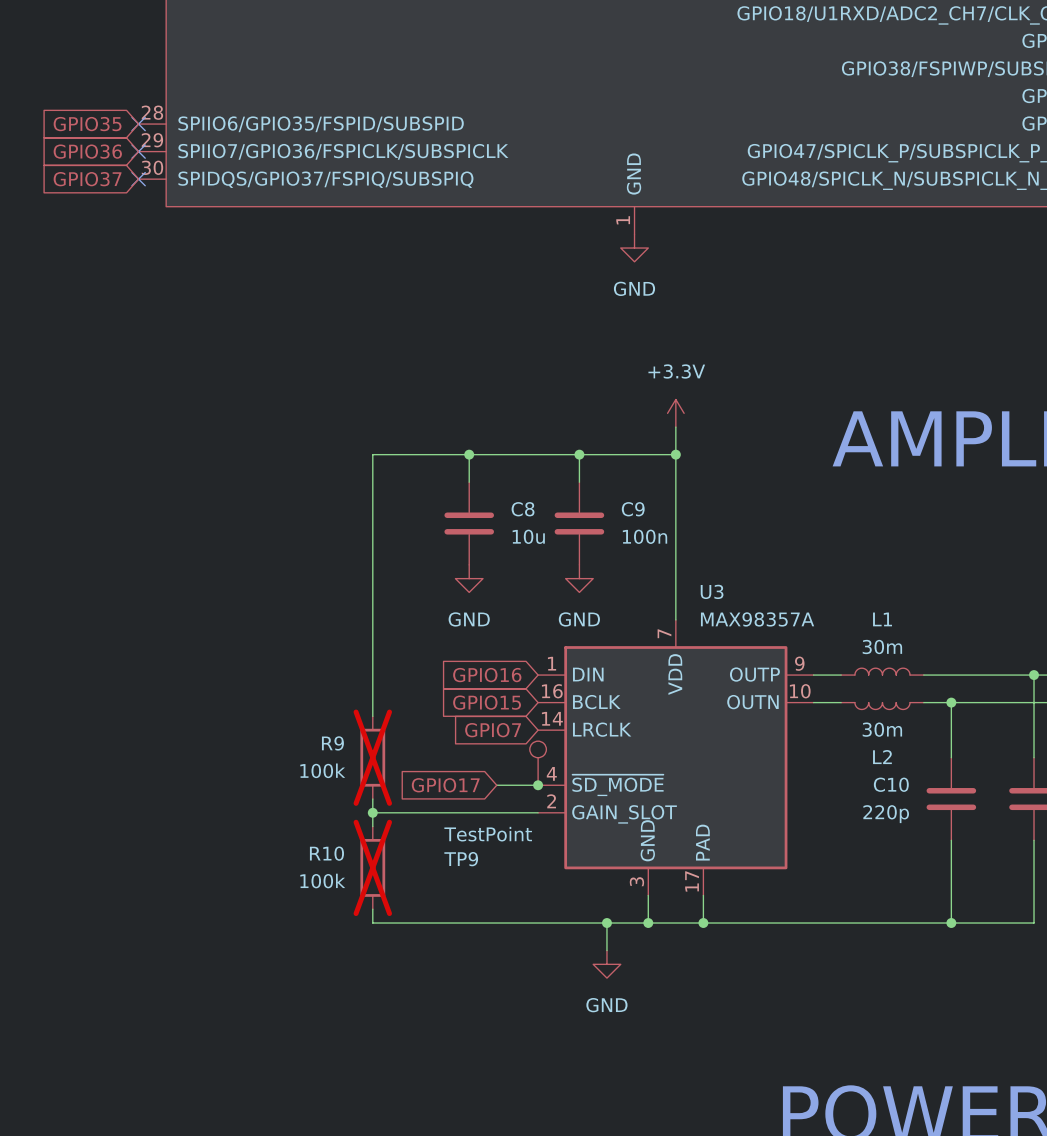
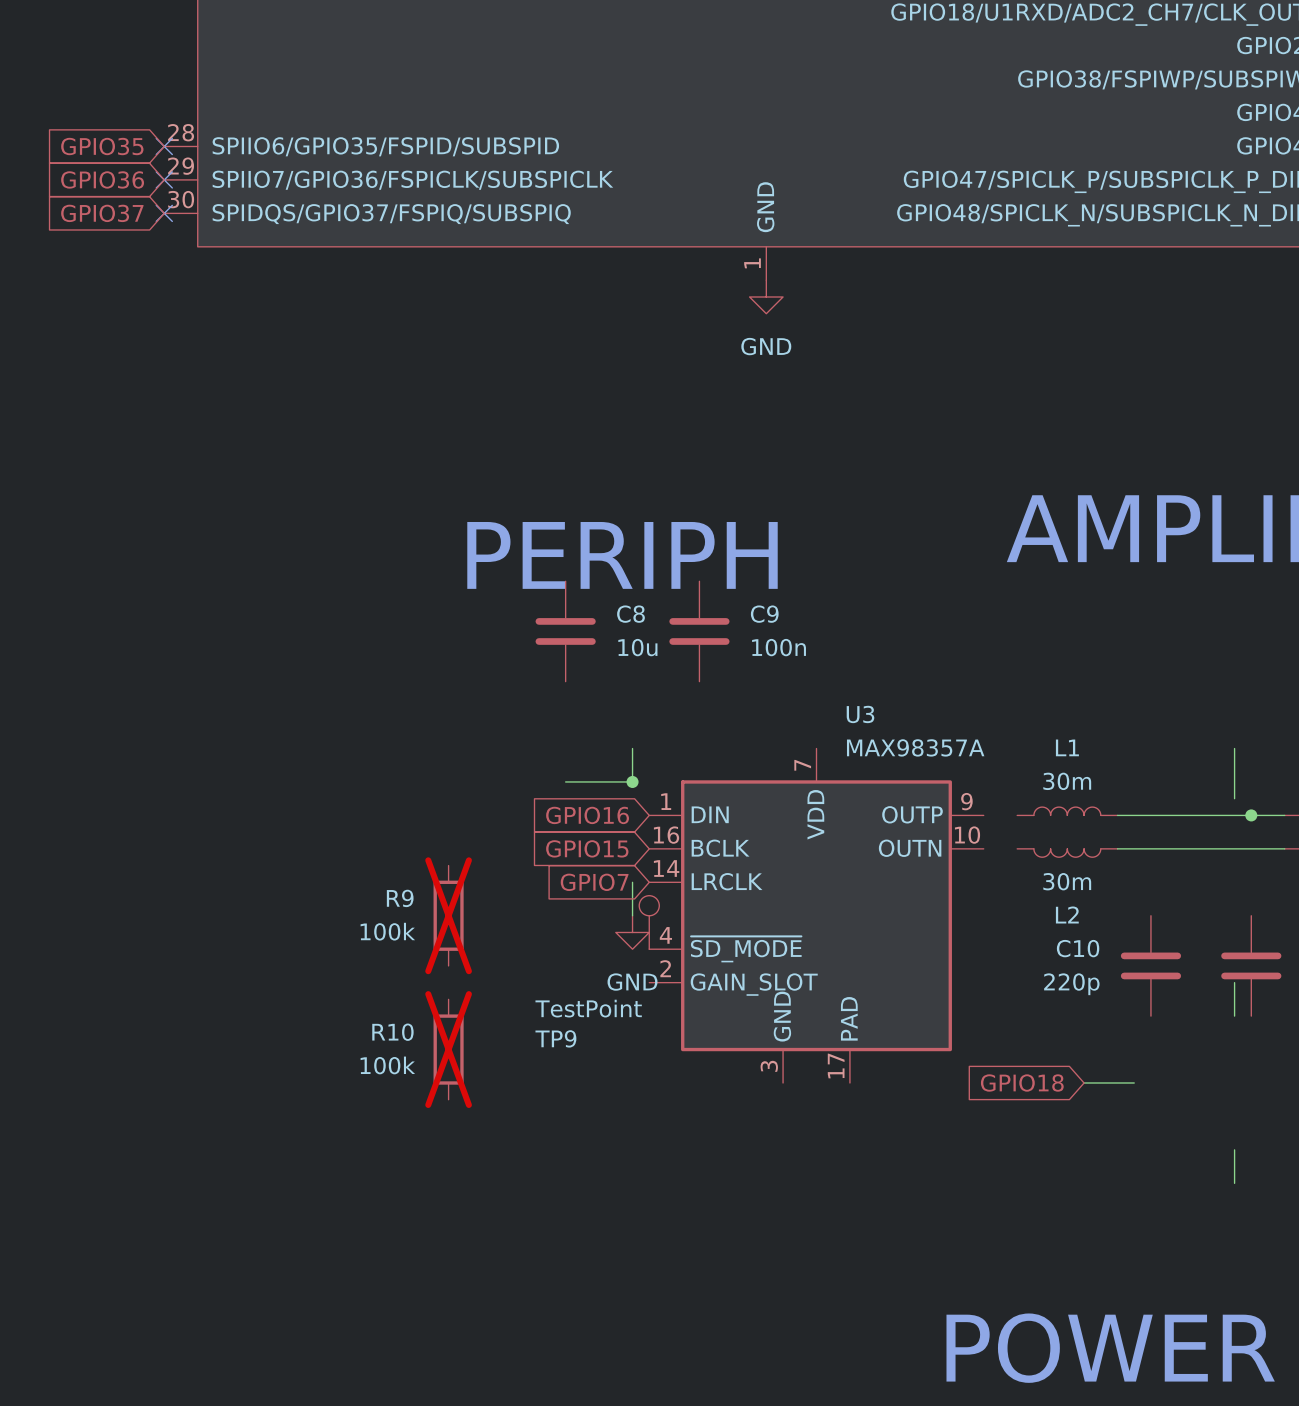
power symbol: +3.3V (675, 413) -> none
wire: (675, 427) (675, 619) -> none
wire: (469, 454) (469, 482) -> none
junction: (469, 454) -> none
wire: (579, 454) (579, 482) -> none
junction: (579, 454) -> none
wire: (675, 454) (372, 454) (372, 716) -> none
junction: (675, 454) -> none
text: none -> PERIPH (622, 555)
power symbol: GND (469, 578) -> none
power symbol: GND (579, 578) -> none
wire: none -> (632, 748) (632, 781) (565, 781)
wire: none -> (1234, 748) (1234, 798)
junction: none -> (632, 781)
wire: (813, 675) (841, 675) -> none
wire: (1034, 675) (1034, 757) -> none
wire: (813, 702) (841, 702) -> none
wire: (951, 702) (951, 757) -> none
junction: (951, 702) -> none
power symbol: none -> GND (632, 932)
global label: GPIO17 (445, 785) -> none
wire: (496, 785) (538, 785) -> none
junction: (538, 785) -> none
wire: (372, 799) (372, 826) -> (632, 882) (632, 915)
wire: (372, 812) (538, 812) -> none
junction: (372, 812) -> none
wire: none -> (1234, 982) (1234, 1016)
wire: (951, 840) (951, 923) -> none
wire: (1034, 840) (1034, 923) (372, 923) (372, 909) -> none
wire: (648, 895) (648, 923) -> none
wire: (703, 895) (703, 923) -> none
global label: none -> GPIO18 (1022, 1083)
wire: none -> (1084, 1082) (1134, 1082)
wire: (606, 923) (606, 950) -> none
junction: (606, 923) -> none
junction: (648, 923) -> none
junction: (703, 923) -> none
junction: (951, 923) -> none
wire: none -> (1234, 1149) (1234, 1183)
power symbol: GND (606, 964) -> none

